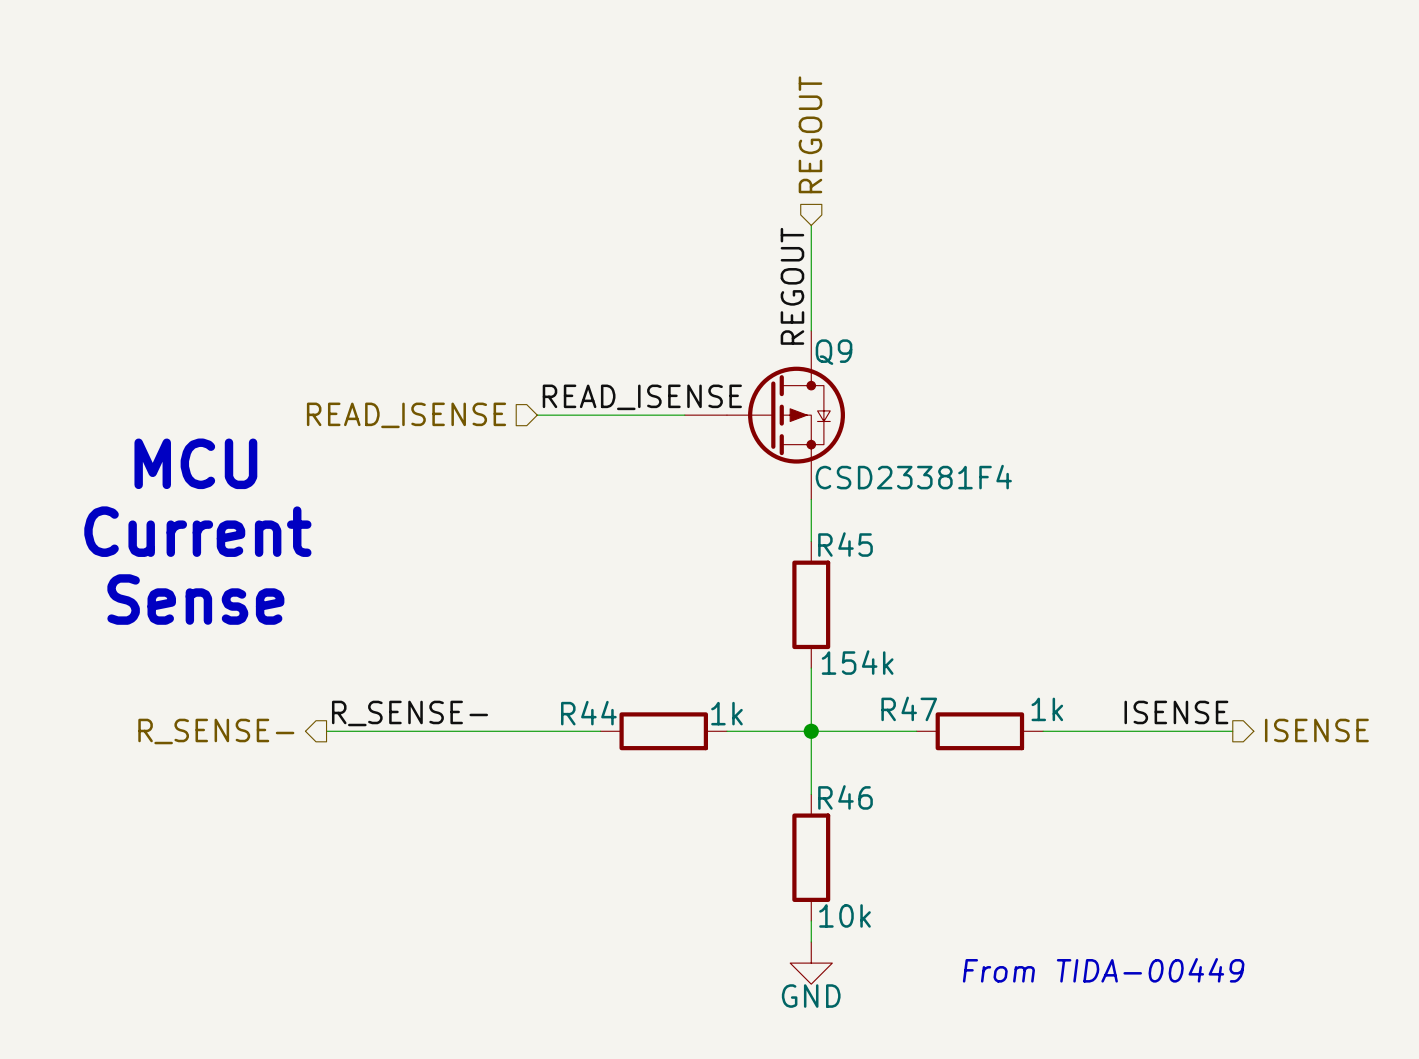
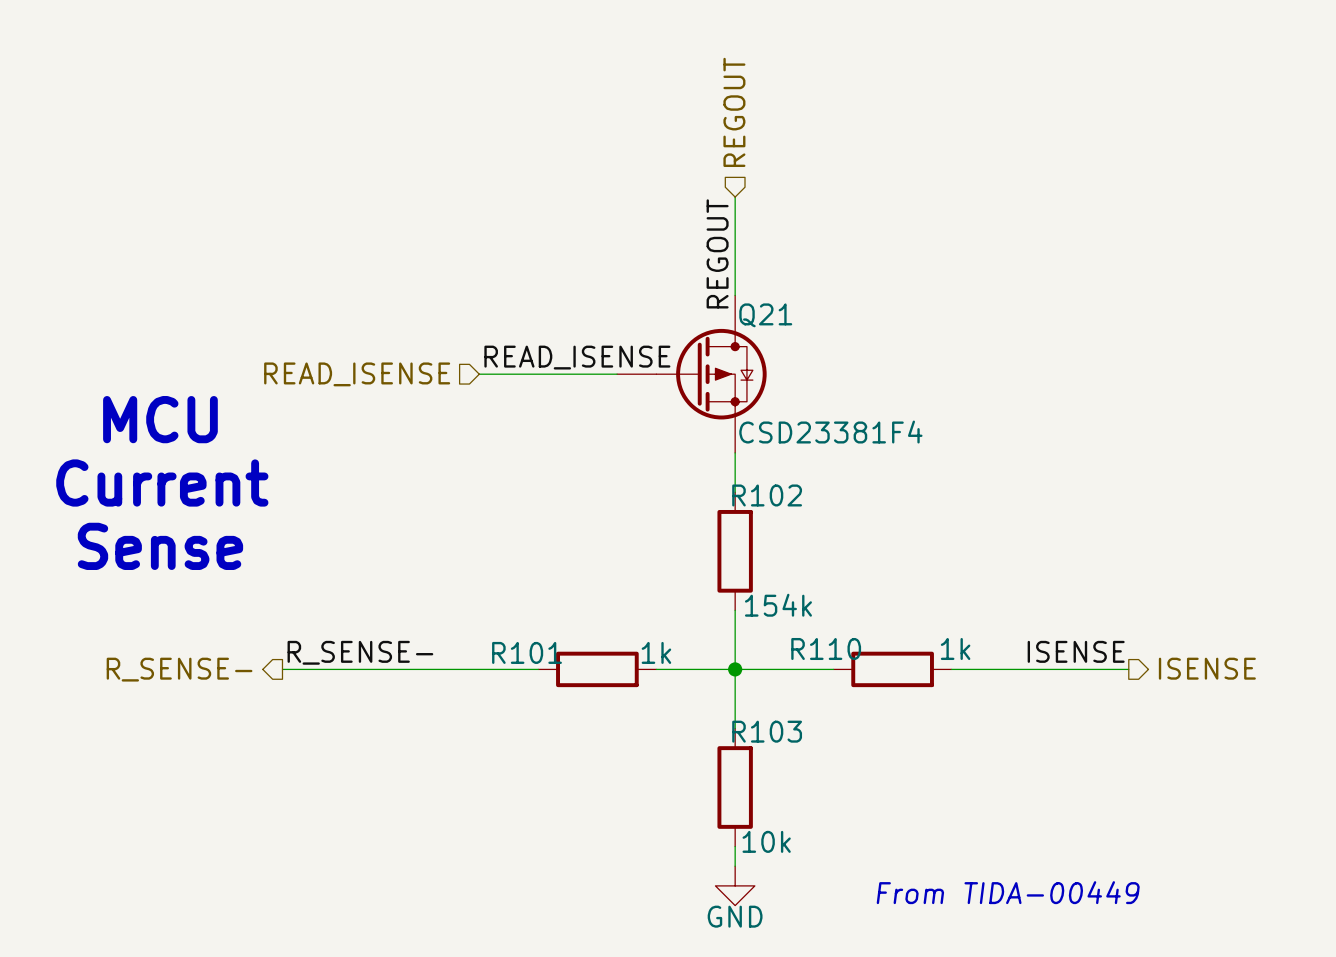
Q9 name: Q9 (834, 352) -> Q21 (765, 315)
R45 name: R45 (845, 544) -> R102 (767, 495)
R47 name: R47 (909, 708) -> R110 (826, 648)
R44 name: R44 (588, 713) -> R101 (527, 652)
R46 name: R46 (845, 797) -> R103 (767, 731)

